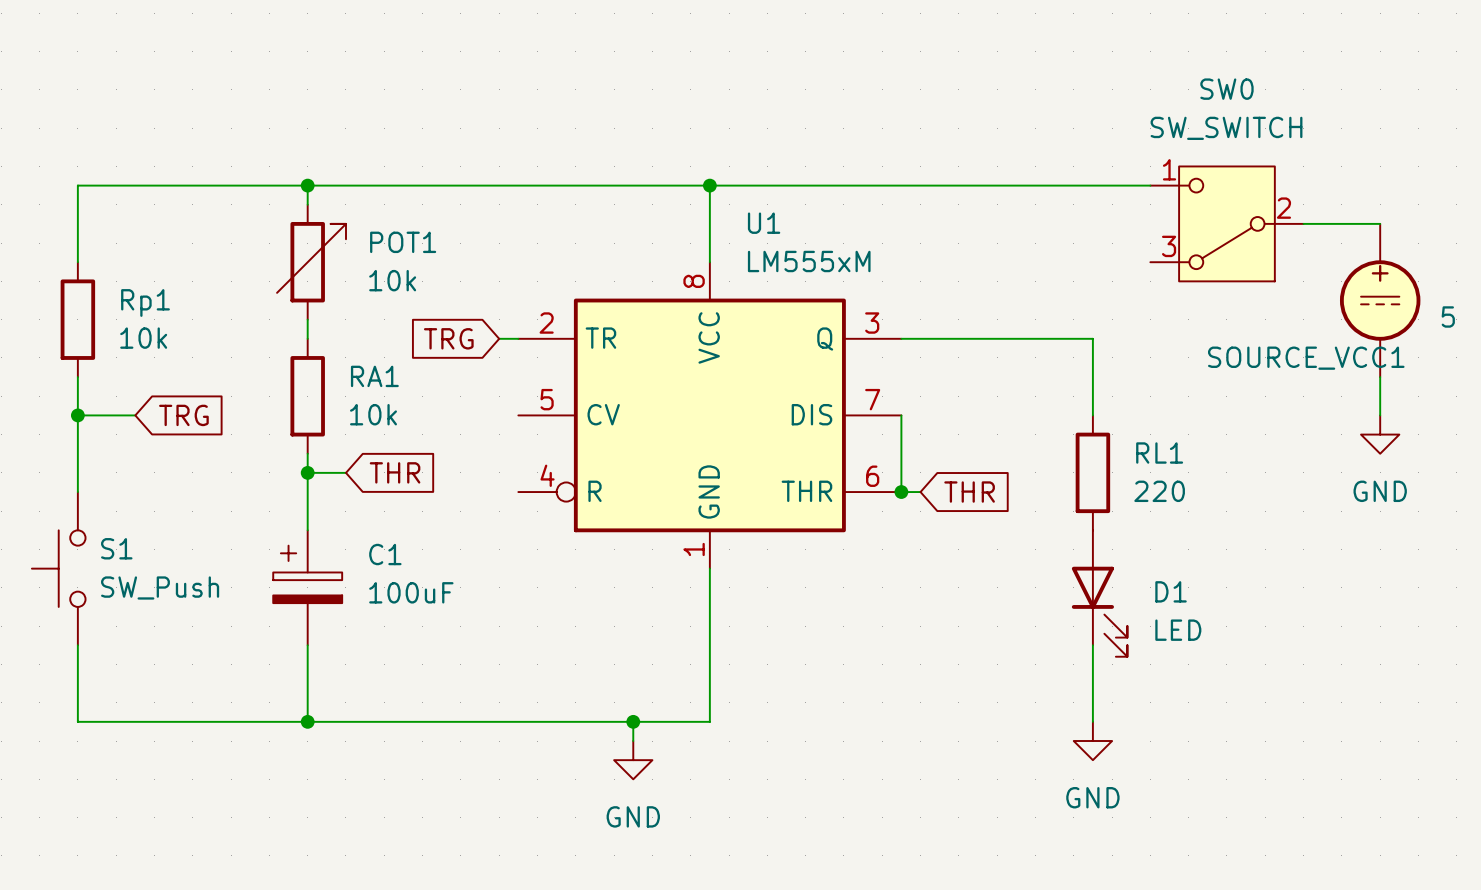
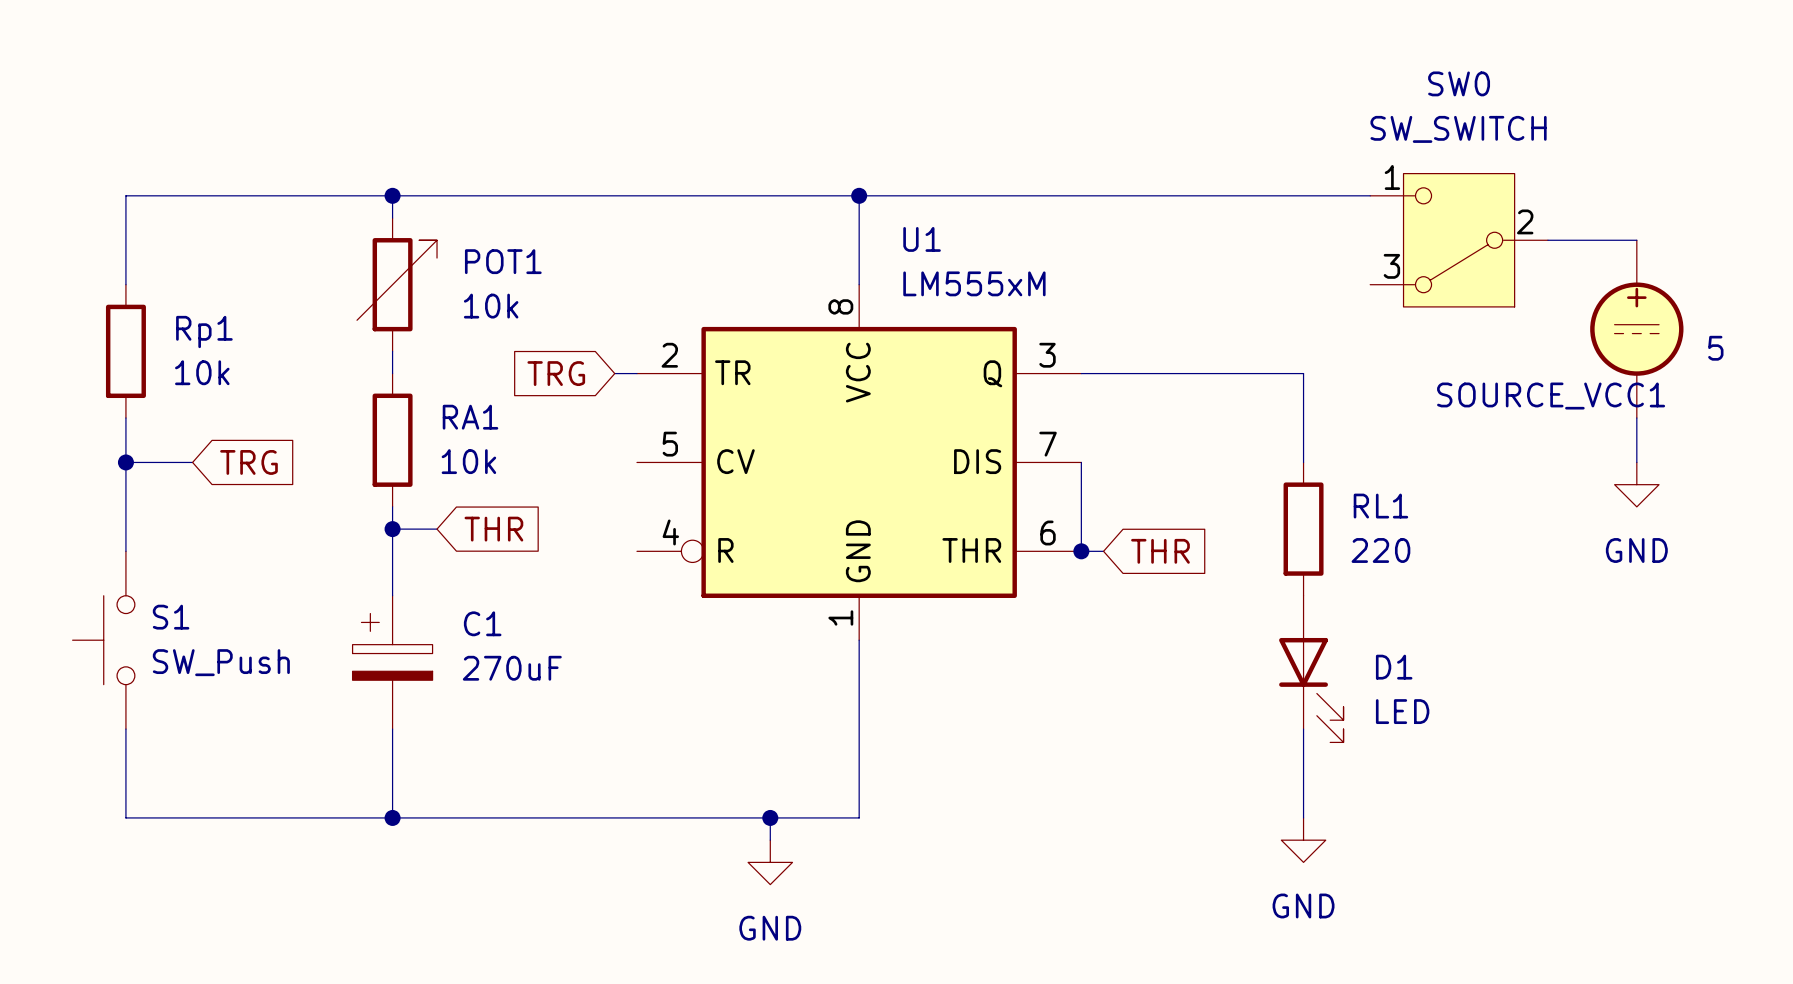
C1 value: 100uF (411, 592) -> 270uF (512, 668)

